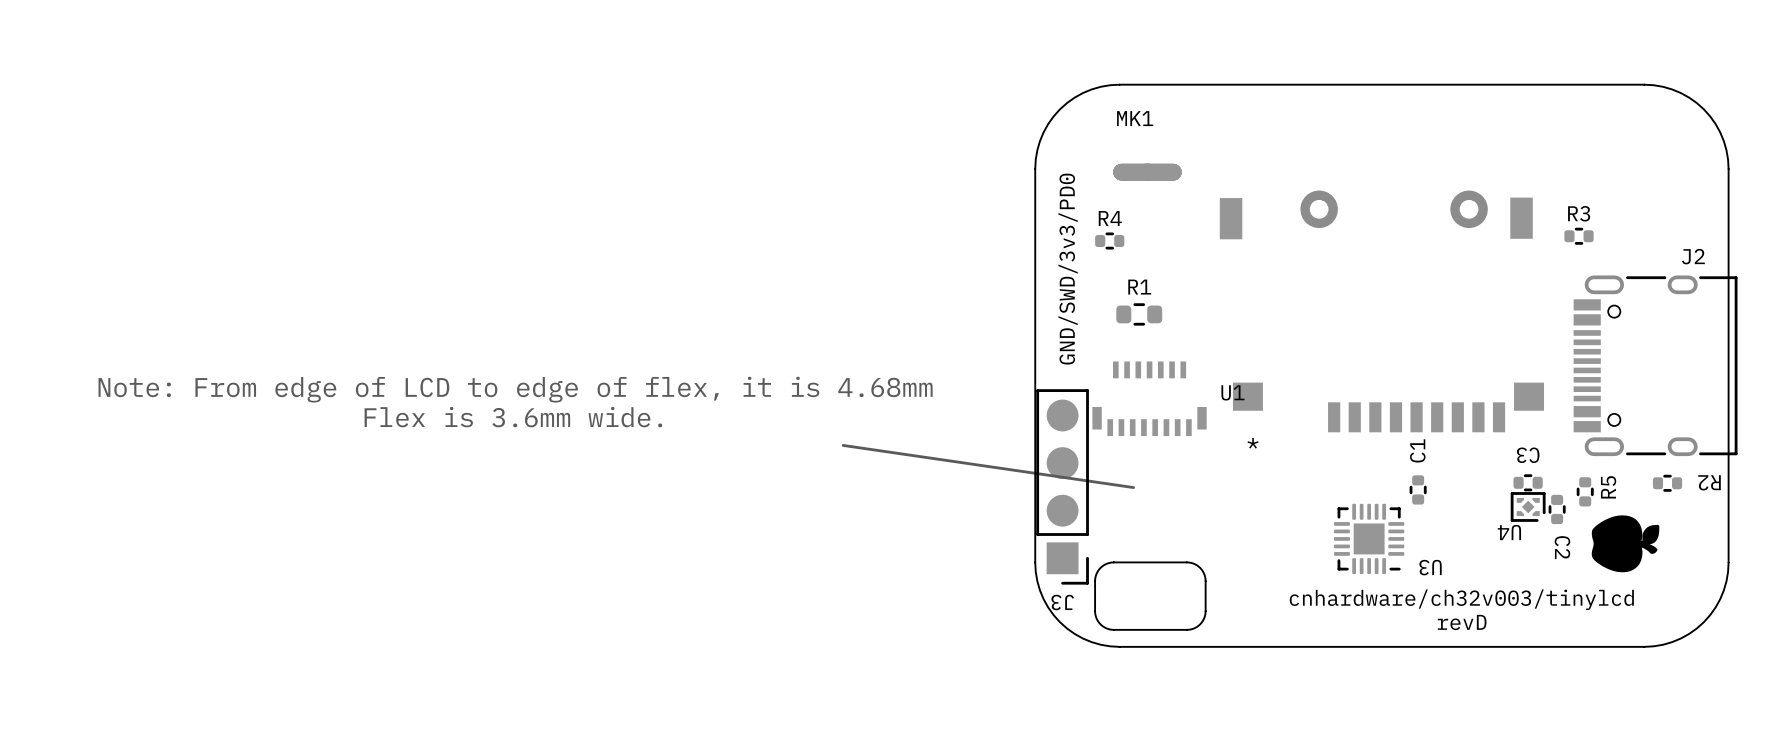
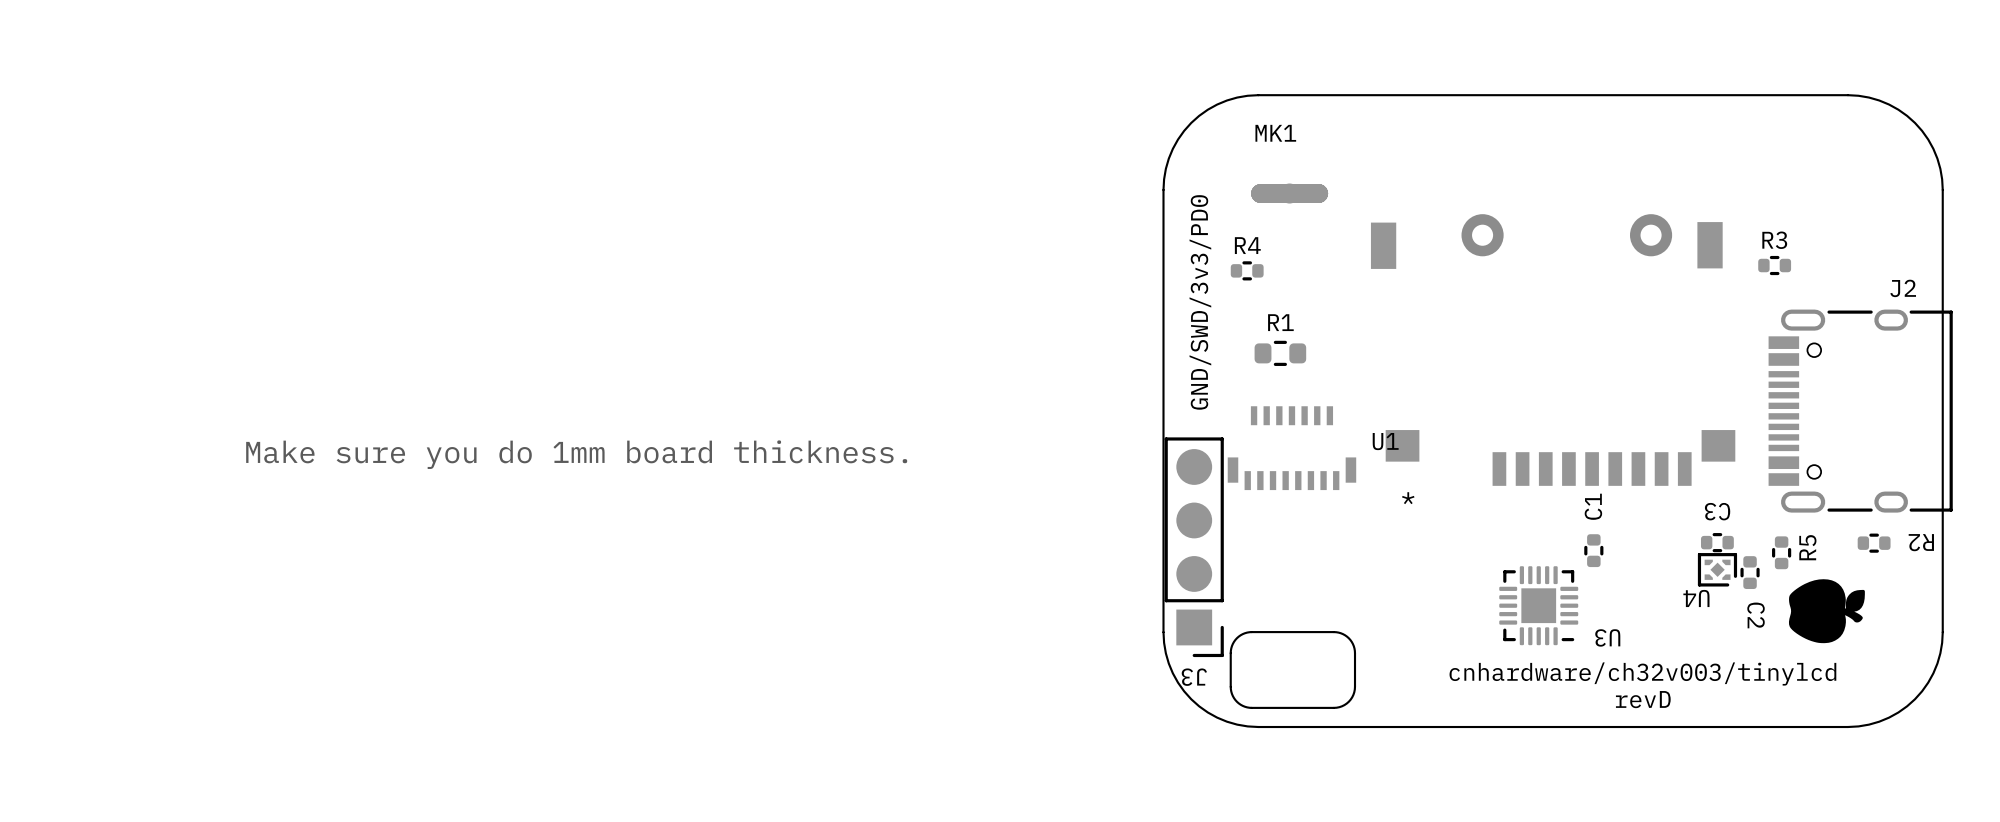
text: Note: From edge of LCD to edge of flex, it is 4.68mm (515, 389) -> none
text: none -> Make sure you do 1mm board thickness. (576, 454)
text: Flex is 3.6mm wide. (513, 417) -> none
line: (843, 445) (1133, 487) -> none

